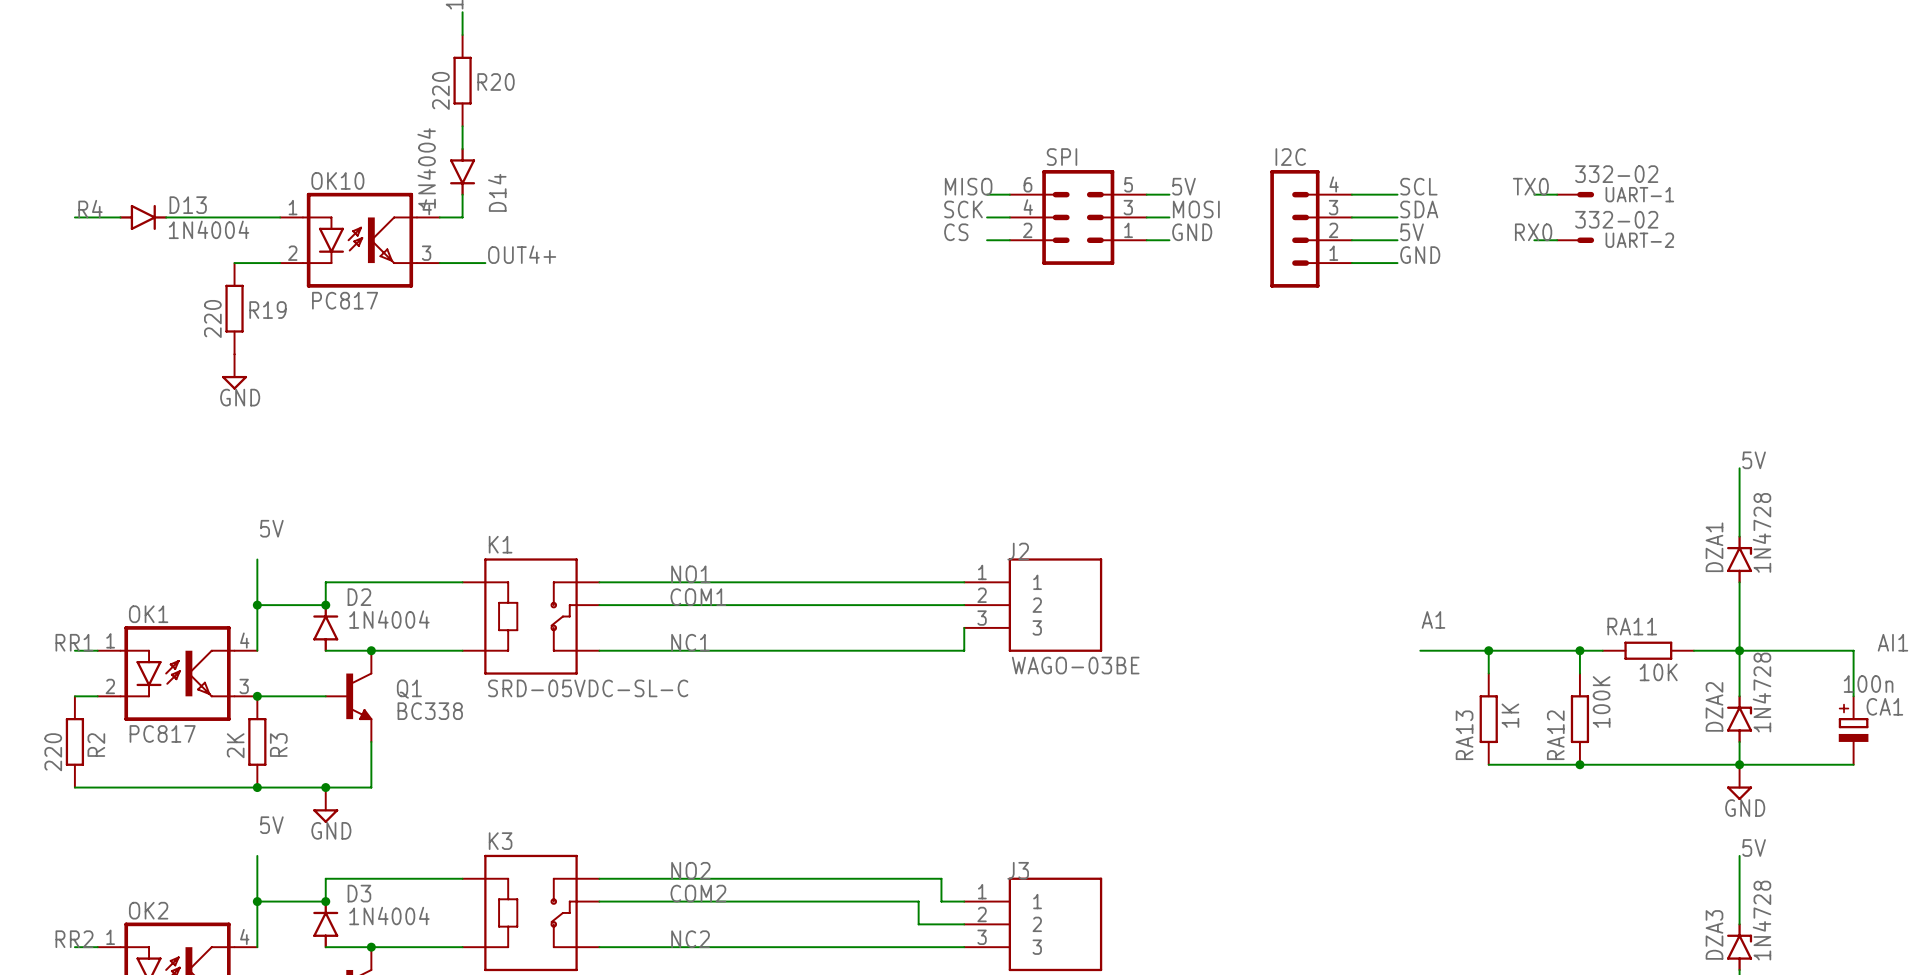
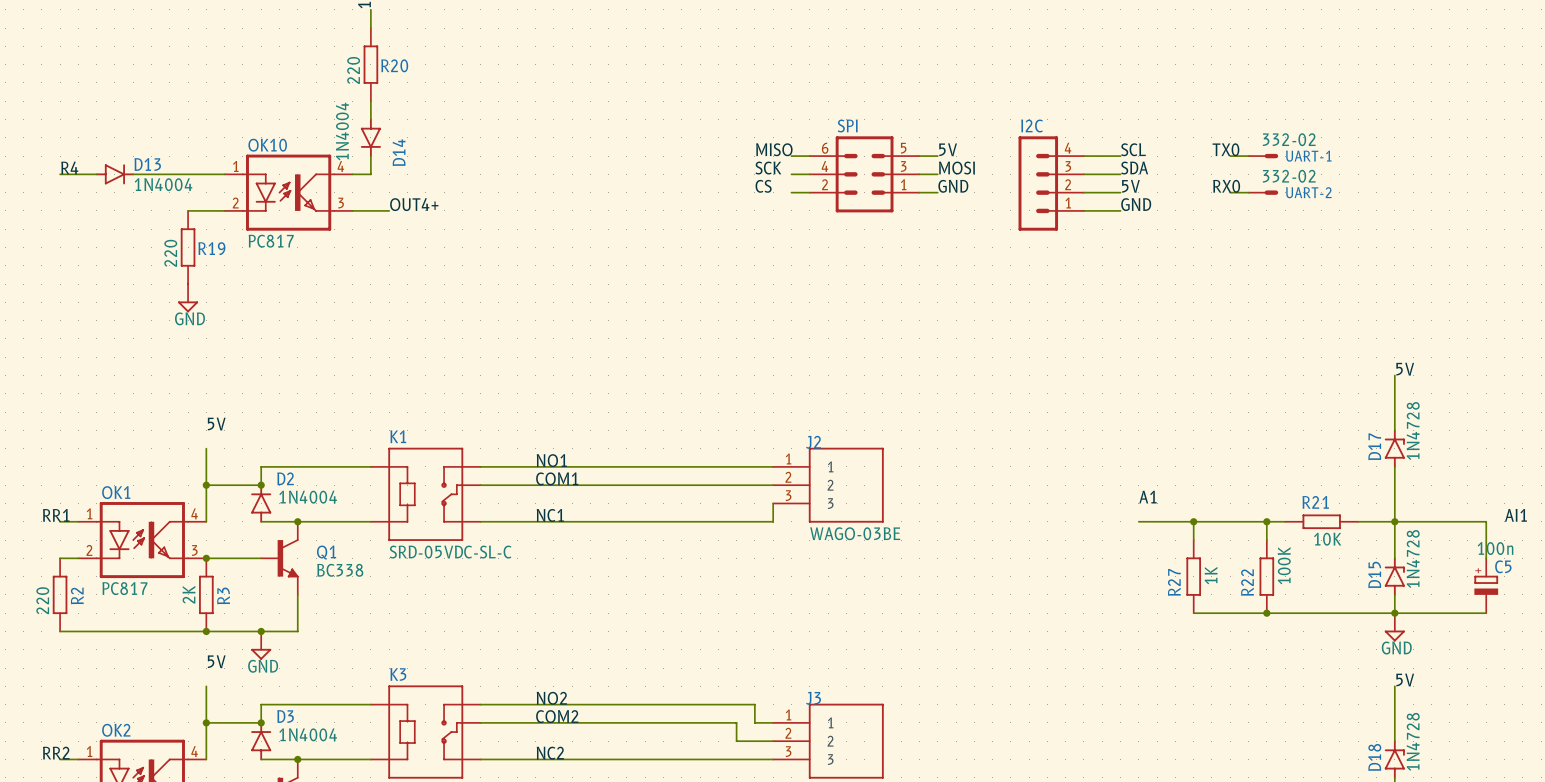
DZA1 name: DZA1 (1714, 547) -> D17 (1374, 446)
RA11 name: RA11 (1632, 626) -> R21 (1315, 502)
DZA2 name: DZA2 (1714, 706) -> D15 (1374, 574)
CA1 name: CA1 (1884, 706) -> C5 (1503, 566)
RA13 name: RA13 (1464, 735) -> R27 (1174, 582)
RA12 name: RA12 (1555, 735) -> R22 (1247, 582)
DZA3 name: DZA3 (1714, 934) -> D18 (1374, 757)

